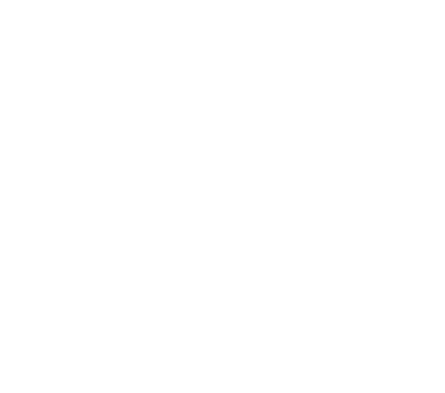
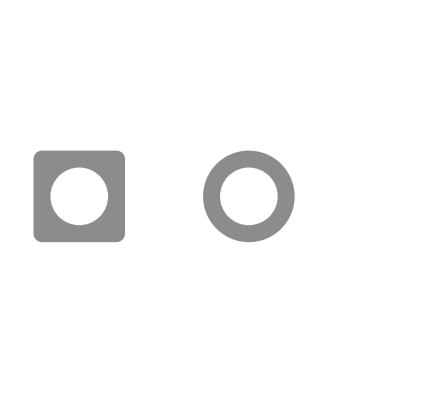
part: none -> (164, 196)

